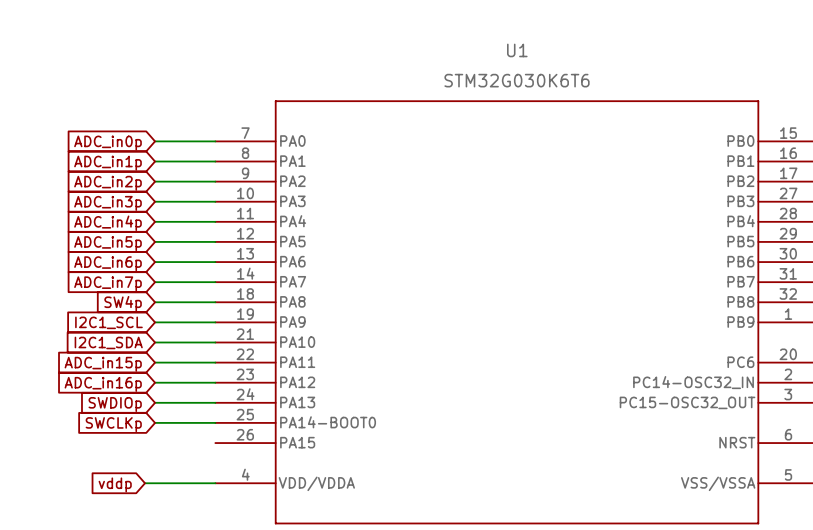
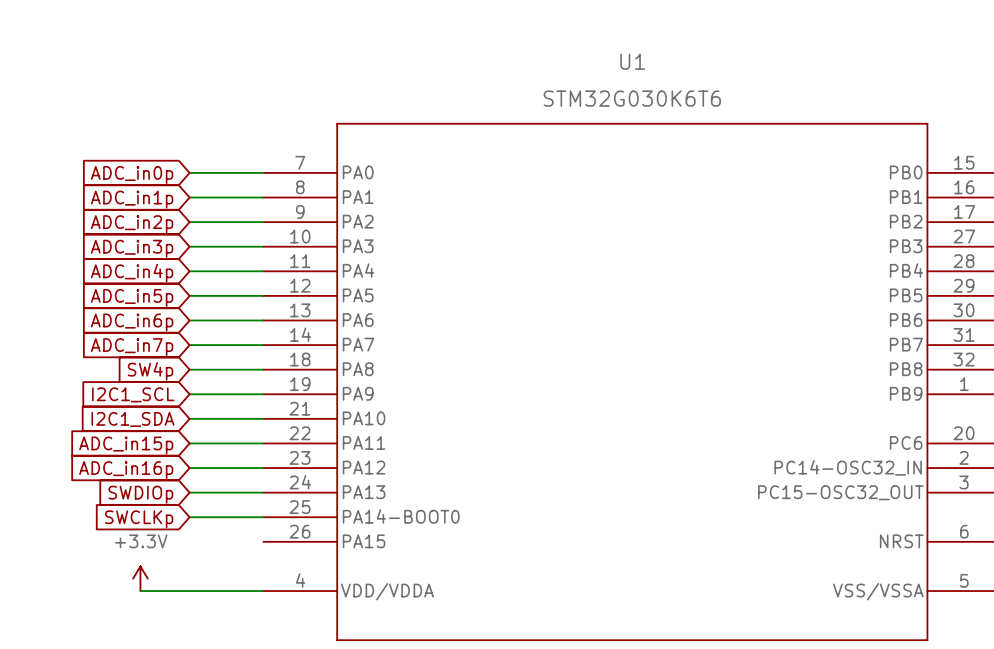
power symbol: none -> +3.3V (140, 578)
wire: none -> (140, 591) (177, 591)
global label: vddp (115, 484) -> none

